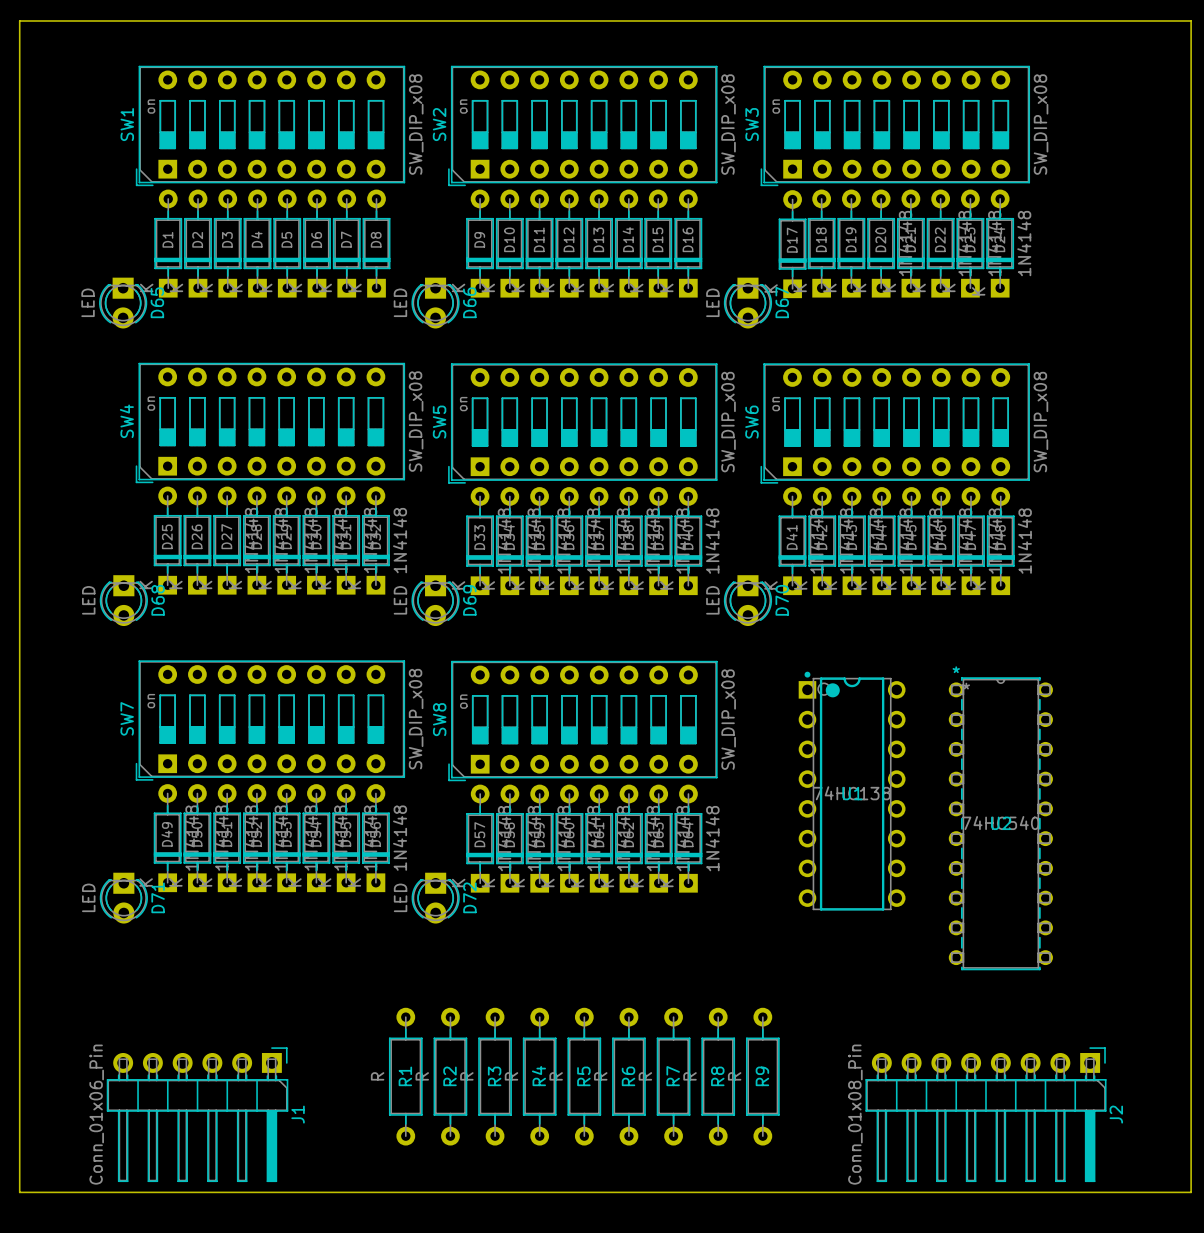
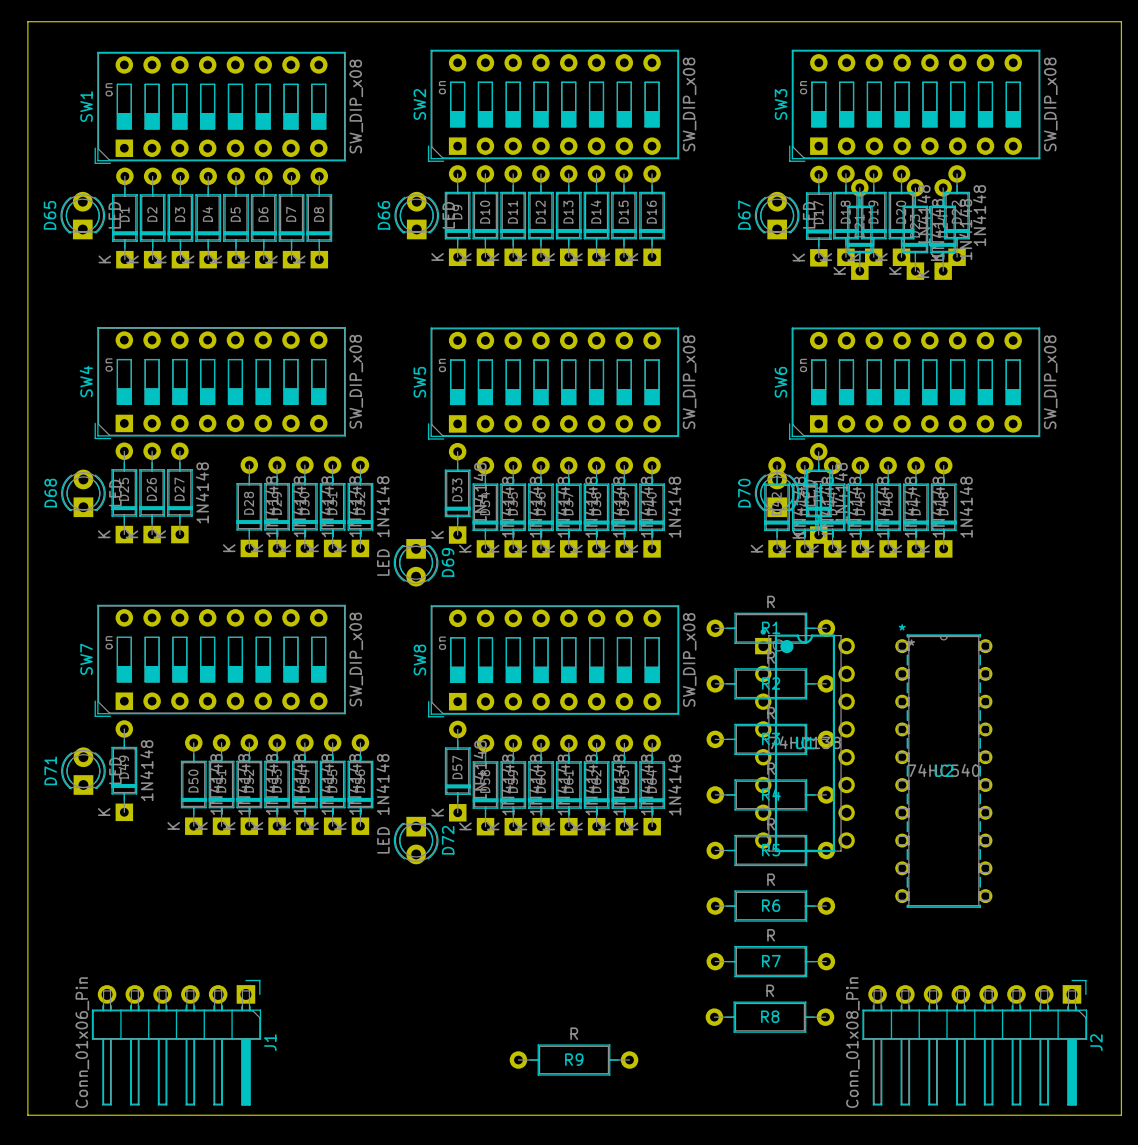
SW1 position: (270, 125) -> (220, 107)
SW2 position: (582, 125) -> (553, 105)
SW3 position: (895, 125) -> (914, 105)
D1 position: (168, 243) -> (124, 218)
D2 position: (198, 243) -> (152, 218)
D3 position: (227, 243) -> (180, 218)
D4 position: (257, 243) -> (208, 218)
D5 position: (287, 243) -> (235, 218)
D6 position: (317, 243) -> (263, 218)
D7 position: (346, 243) -> (291, 218)
D8 position: (376, 243) -> (319, 218)
D9 position: (480, 243) -> (457, 215)
D10 position: (509, 243) -> (485, 215)
D11 position: (539, 243) -> (513, 215)
D12 position: (569, 243) -> (540, 215)
D13 position: (599, 243) -> (568, 215)
D14 position: (628, 243) -> (596, 215)
D15 position: (658, 243) -> (623, 215)
D16 position: (688, 243) -> (652, 215)
D18 position: (821, 243) -> (845, 215)
D19 position: (851, 243) -> (873, 215)
D20 position: (881, 243) -> (901, 215)
D22 position: (940, 243) -> (957, 215)
D17 position: (792, 244) -> (818, 216)
D65 rotation: 0° (123, 303) -> 180° (82, 215)
D65 position: (123, 303) -> (82, 215)
D66 rotation: 0° (435, 303) -> 180° (416, 215)
D66 position: (435, 303) -> (416, 215)
D67 rotation: 0° (747, 303) -> 180° (777, 215)
D67 position: (747, 303) -> (777, 215)
SW4 position: (270, 422) -> (220, 383)
SW5 position: (582, 423) -> (553, 383)
SW6 position: (895, 423) -> (914, 383)
D25 position: (167, 540) -> (124, 492)
D26 position: (197, 540) -> (152, 492)
D27 position: (227, 540) -> (179, 492)
D33 position: (480, 541) -> (457, 493)
D41 position: (792, 541) -> (818, 493)
D68 rotation: 0° (123, 600) -> 180° (83, 493)
D68 position: (123, 600) -> (83, 493)
D70 rotation: 0° (747, 600) -> 180° (777, 493)
D70 position: (747, 600) -> (777, 493)
SW7 position: (270, 720) -> (220, 660)
SW8 position: (582, 721) -> (553, 661)
D49 position: (167, 838) -> (124, 770)
D57 position: (480, 838) -> (457, 771)
D71 rotation: 0° (123, 898) -> 180° (83, 771)
D71 position: (123, 898) -> (83, 771)
R1 rotation: 0° (405, 1076) -> 90° clockwise (770, 628)
R1 position: (405, 1076) -> (770, 628)
R2 rotation: 0° (450, 1076) -> 90° clockwise (770, 683)
R2 position: (450, 1076) -> (770, 683)
R3 rotation: 0° (495, 1076) -> 90° clockwise (770, 739)
R3 position: (495, 1076) -> (770, 739)
R4 rotation: 0° (539, 1076) -> 90° clockwise (770, 794)
R4 position: (539, 1076) -> (770, 794)
R5 rotation: 0° (584, 1076) -> 90° clockwise (770, 850)
R5 position: (584, 1076) -> (770, 850)
R6 rotation: 0° (628, 1076) -> 90° clockwise (770, 906)
R6 position: (628, 1076) -> (770, 906)
R7 rotation: 0° (673, 1076) -> 90° clockwise (770, 961)
R7 position: (673, 1076) -> (770, 961)
R8 rotation: 0° (718, 1076) -> 90° clockwise (769, 1017)
R8 position: (718, 1076) -> (769, 1017)
R9 rotation: 0° (762, 1076) -> 90° clockwise (573, 1060)
R9 position: (762, 1076) -> (573, 1060)
J1 position: (197, 1114) -> (176, 1042)
J2 position: (985, 1114) -> (974, 1042)

